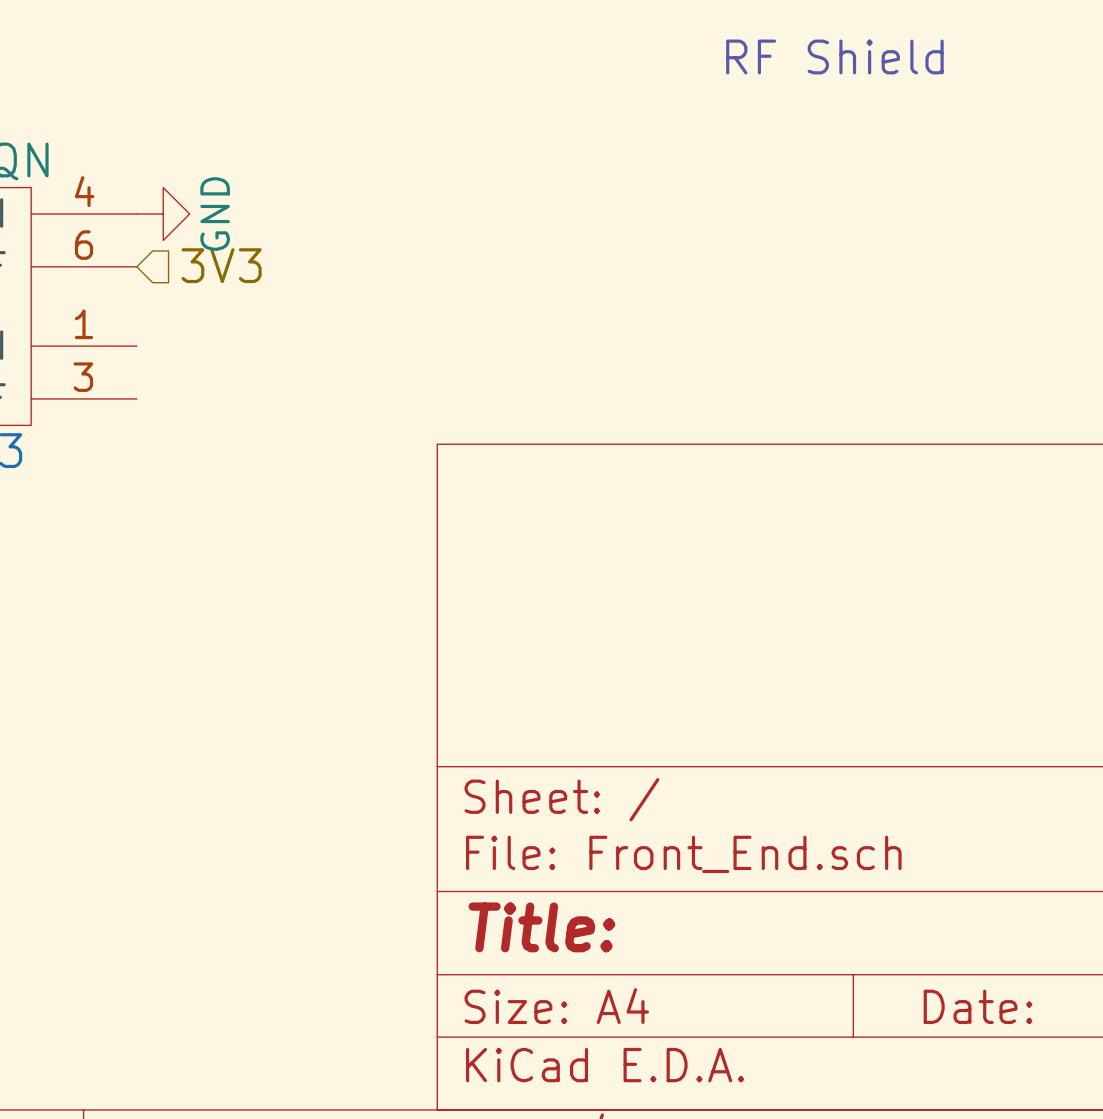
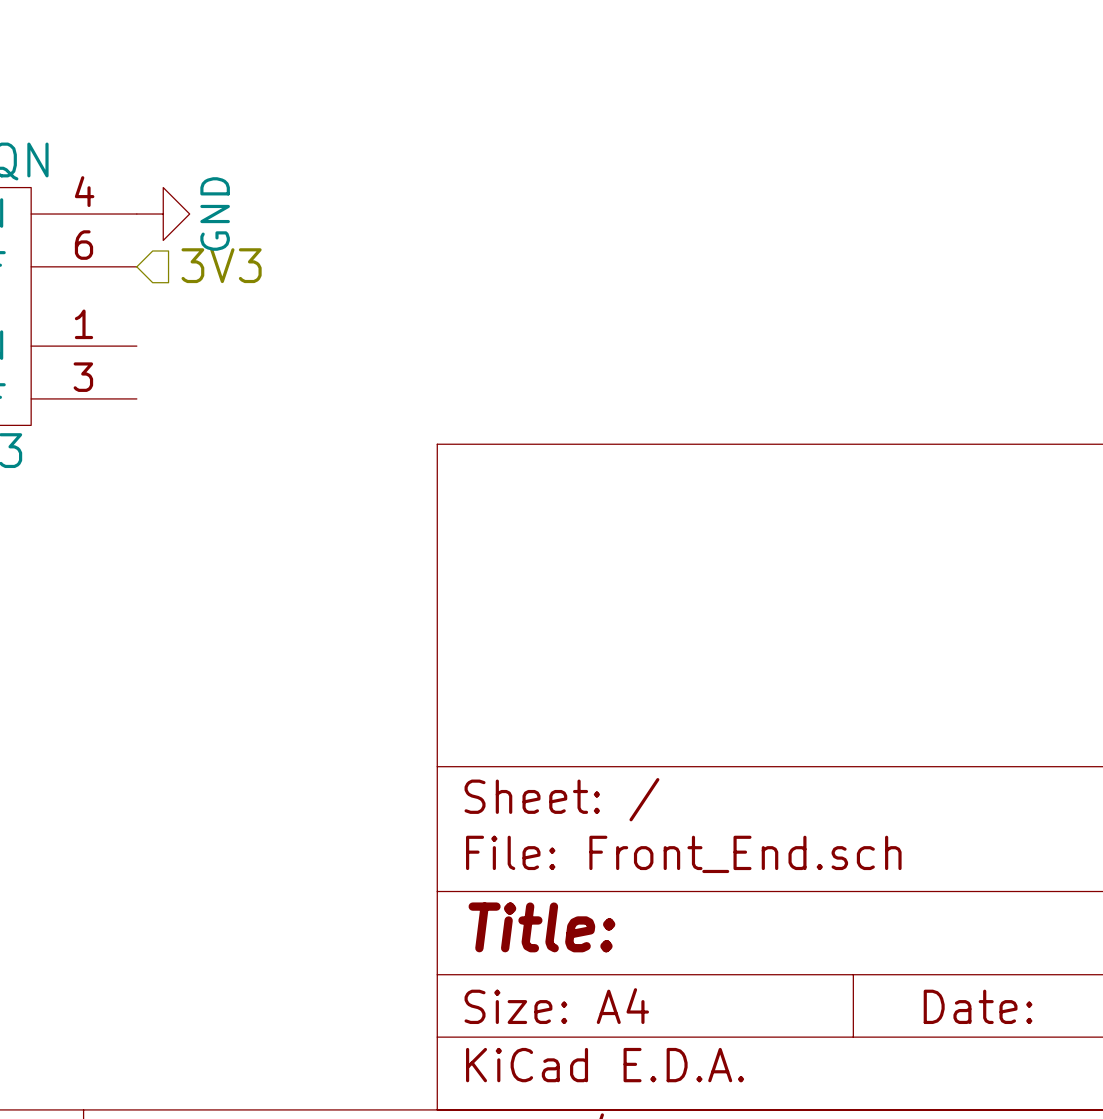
text: RF Shield (834, 56) -> none

